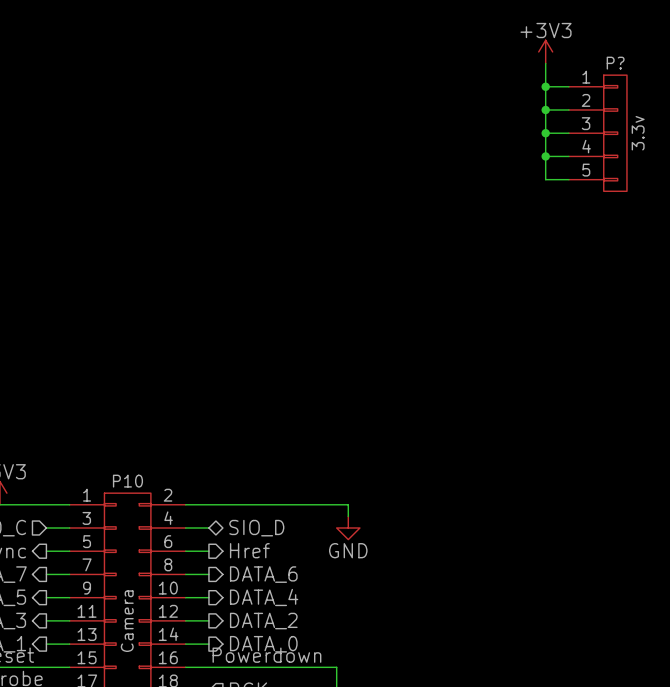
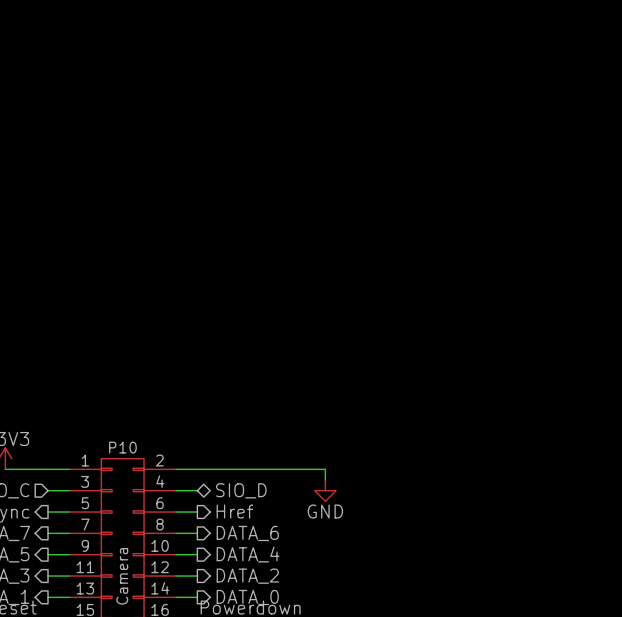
power symbol: +3V3 (545, 51) -> none
wire: (545, 63) (545, 179) (568, 179) -> none
wire: (545, 86) (568, 86) -> none
junction: (545, 86) -> none
wire: (545, 109) (568, 109) -> none
junction: (545, 109) -> none
wire: (545, 133) (568, 133) -> none
junction: (545, 133) -> none
P?: 3.3v (597, 133) -> none
wire: (545, 156) (568, 156) -> none
junction: (545, 156) -> none

